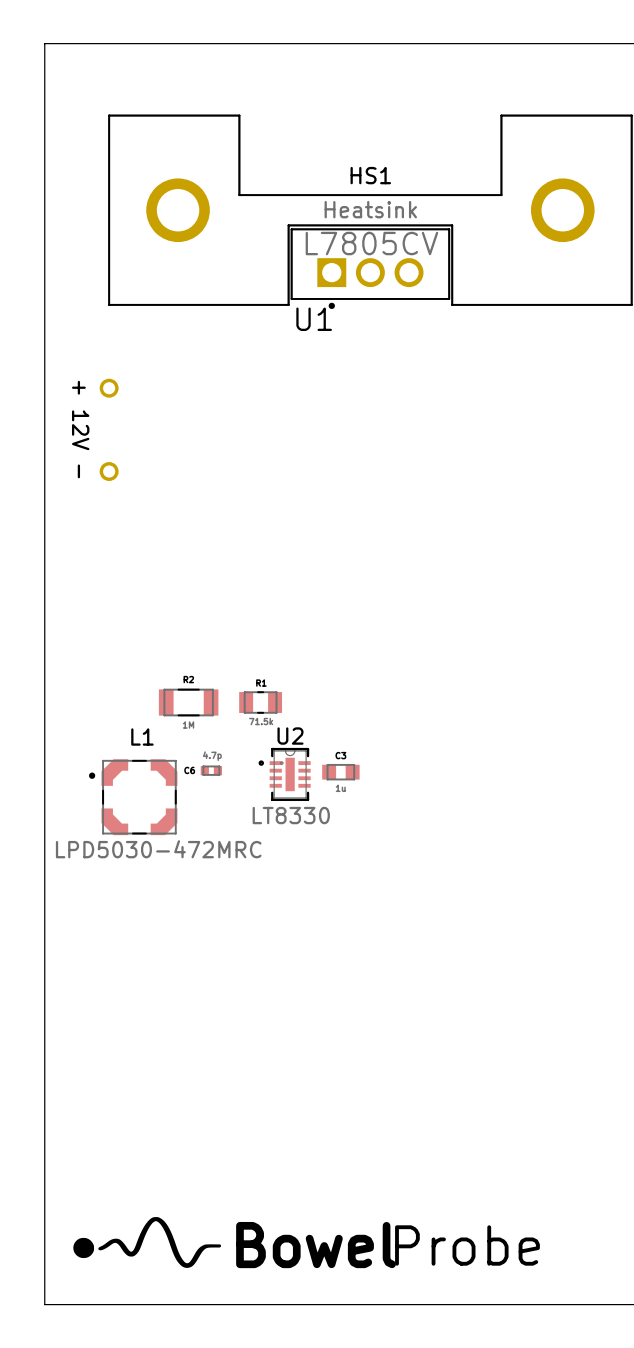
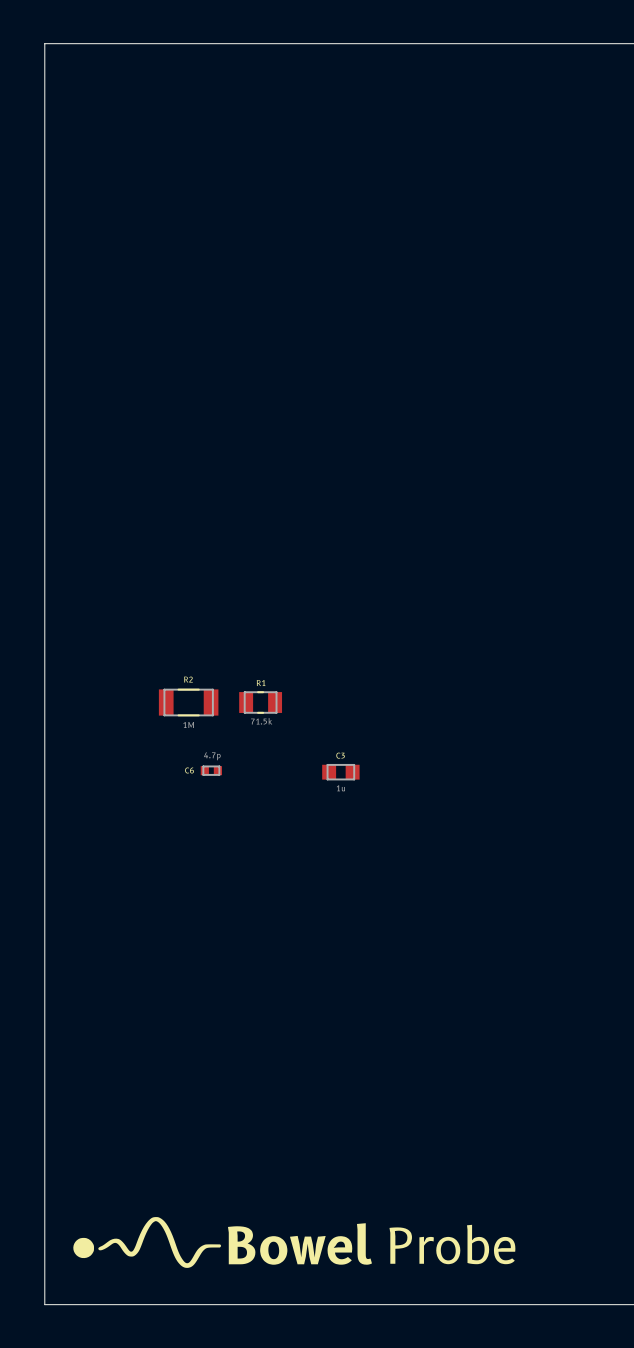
HS1: Heatsink (370, 210) -> none
U1: L7805CV (370, 268) -> none
part: (109, 388) -> none
text: + 12V - (80, 429) -> none
part: (109, 471) -> none
U2: LT8330 (284, 774) -> none
L1: LPD5030-472MRC (133, 797) -> none

